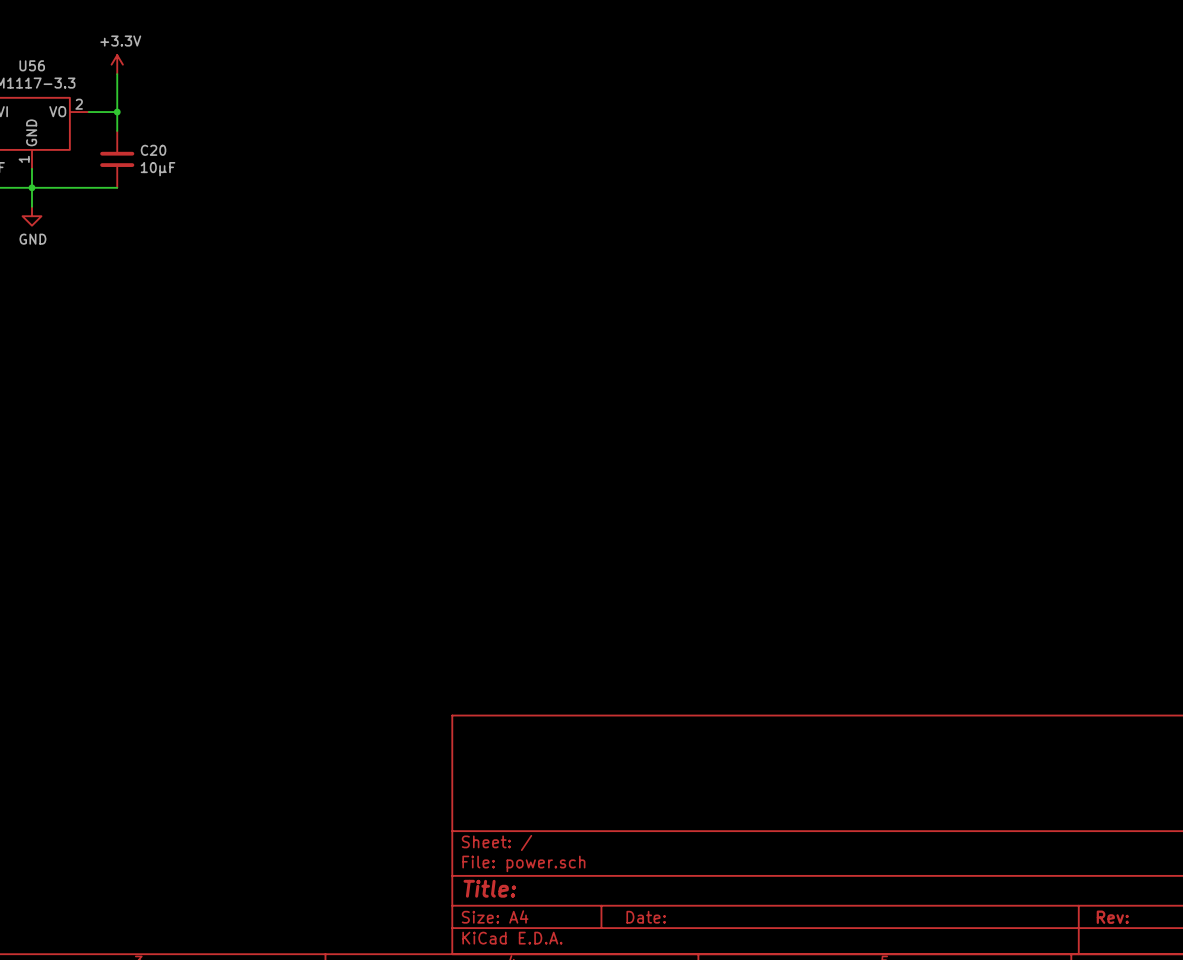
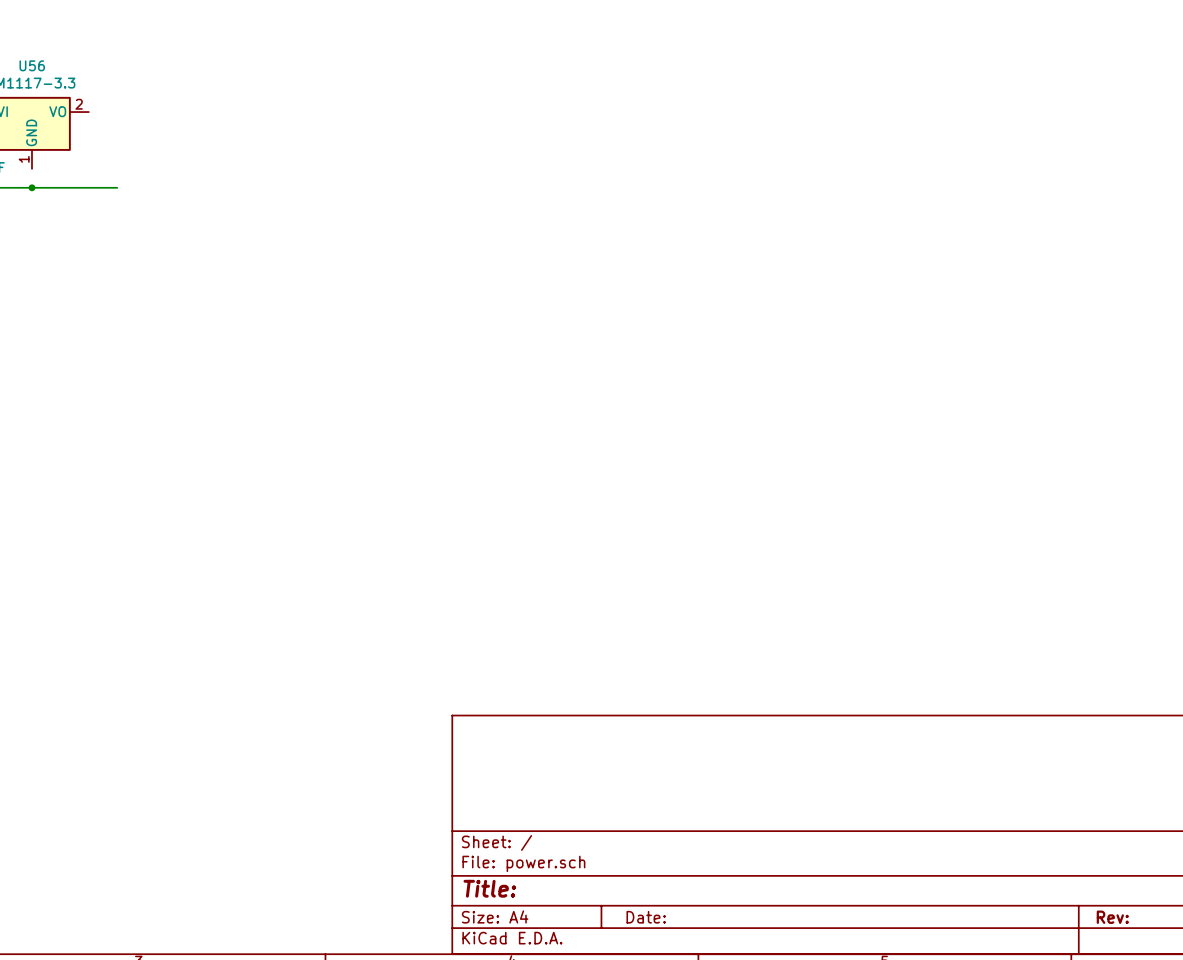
power symbol: +3.3V (117, 64) -> none
wire: (117, 74) (117, 130) -> none
wire: (88, 112) (117, 112) -> none
junction: (117, 112) -> none
C20: 10µF (117, 159) -> none
wire: (31, 168) (31, 206) -> none
power symbol: GND (31, 216) -> none

